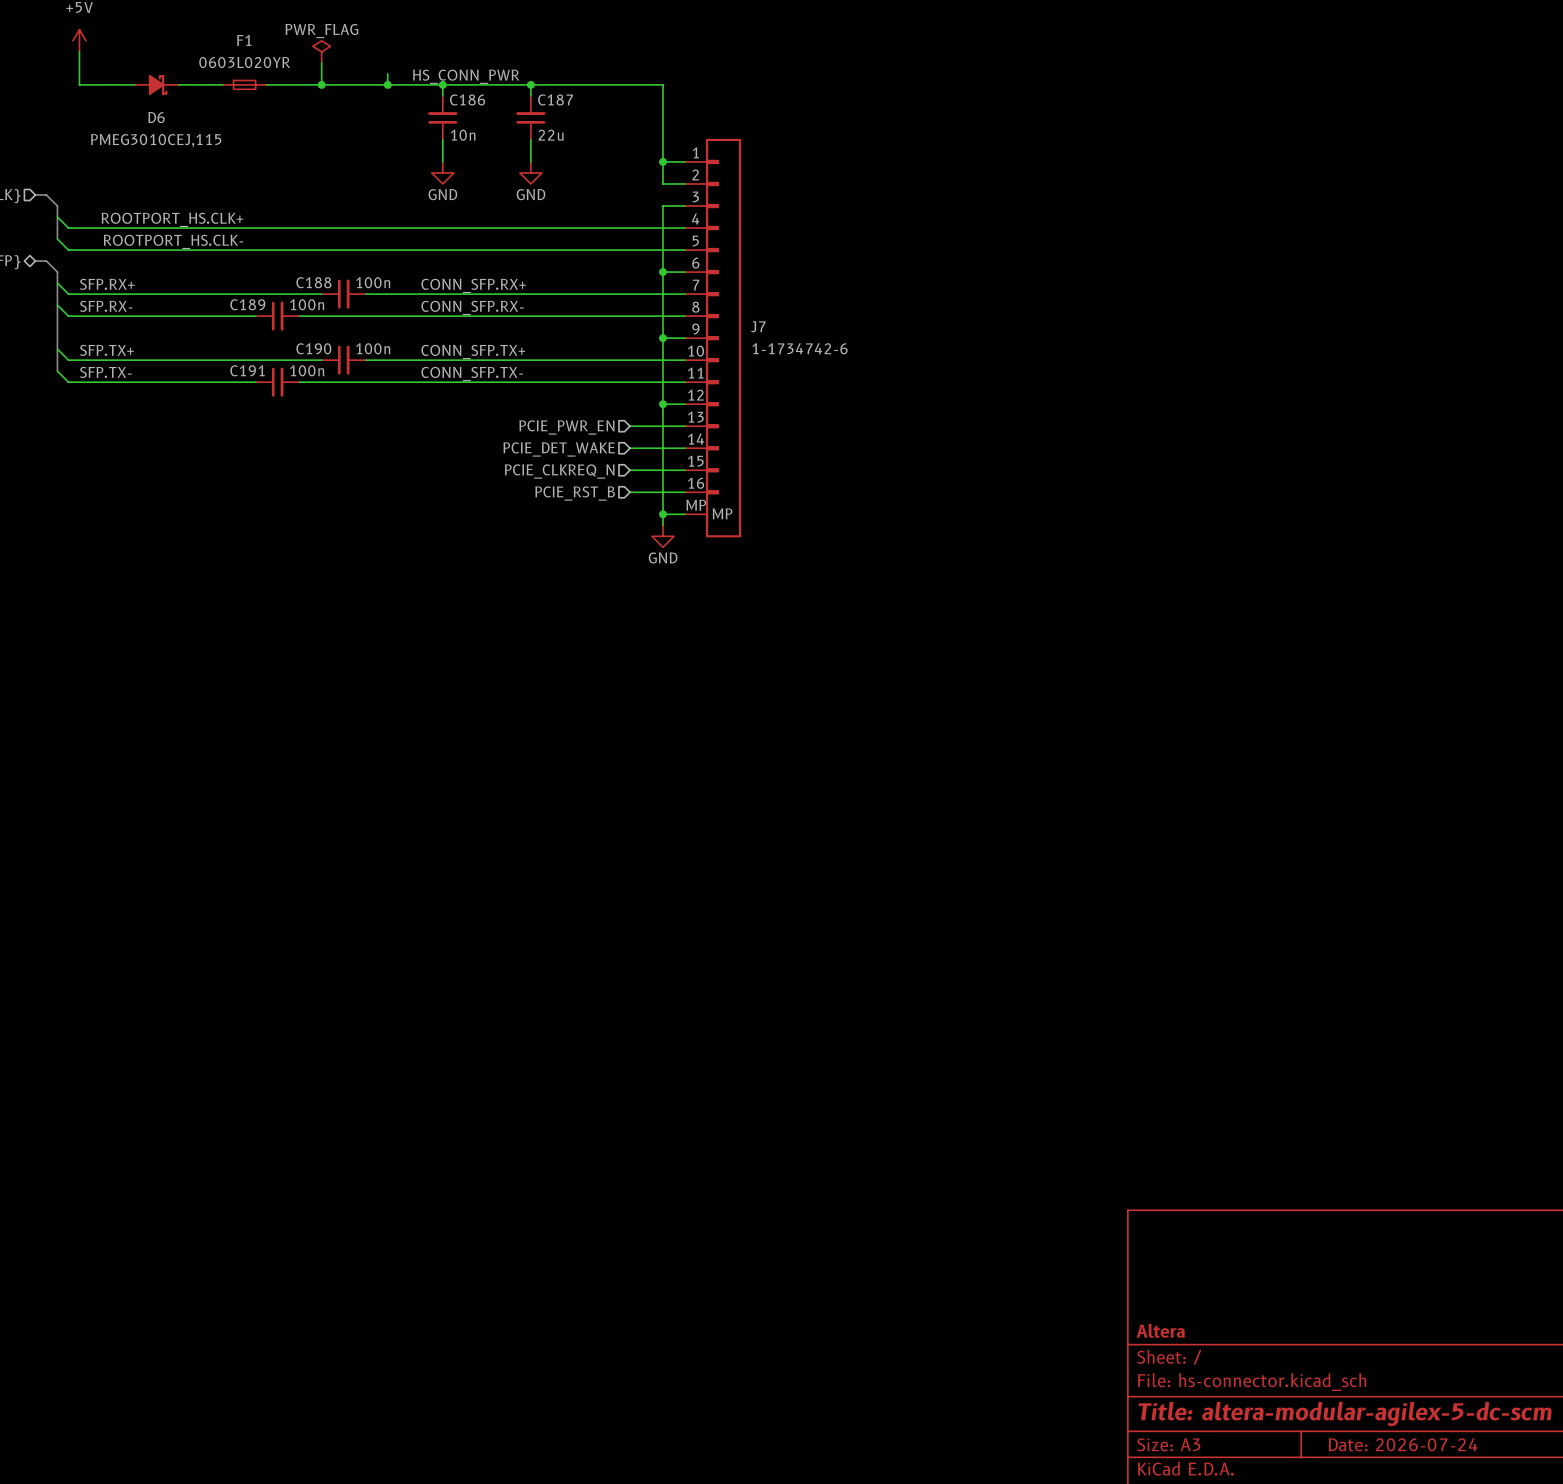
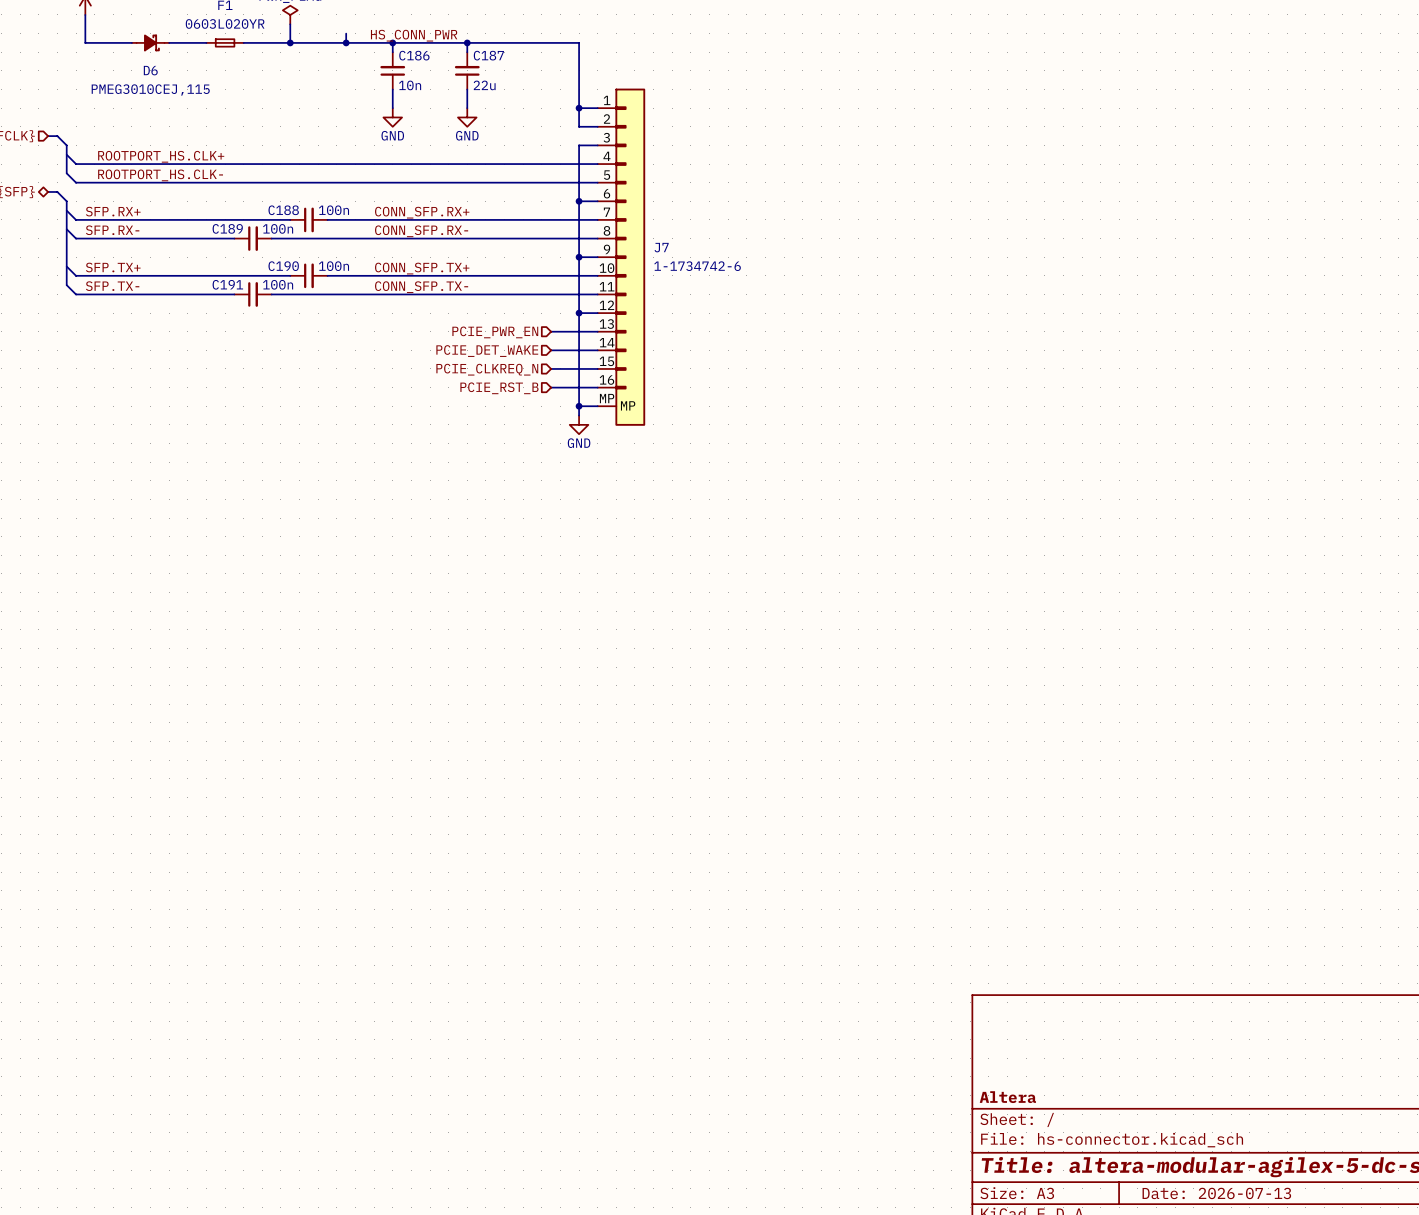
title block: Date: 2026-07-24 (1403, 1444) -> Date: 2026-07-13 (1216, 1193)

